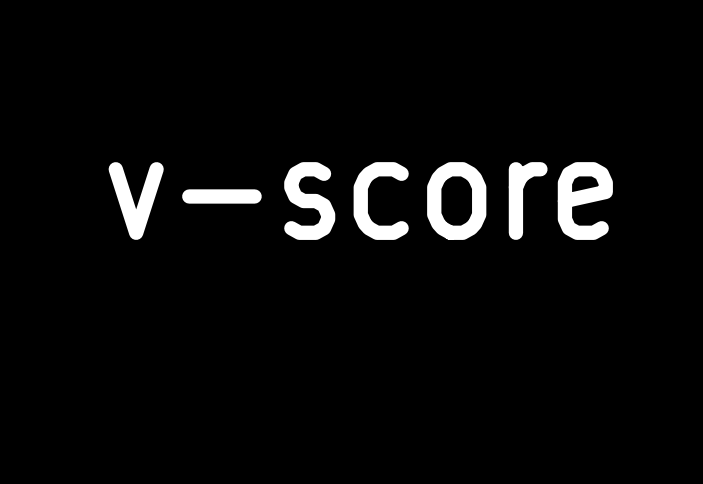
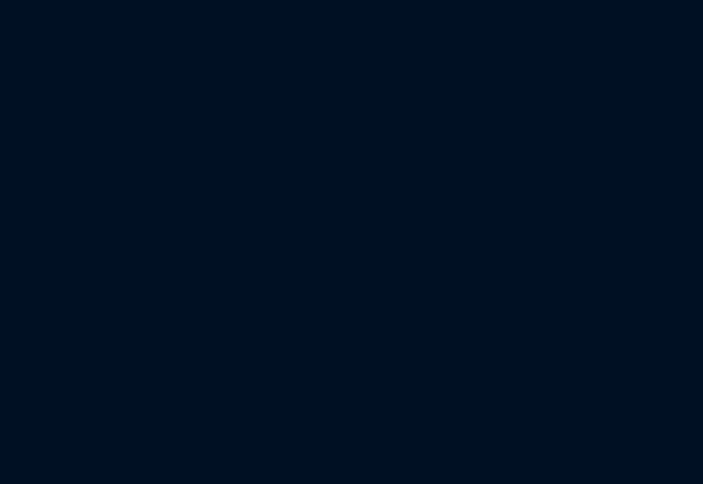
text: v-score (360, 201) -> none

